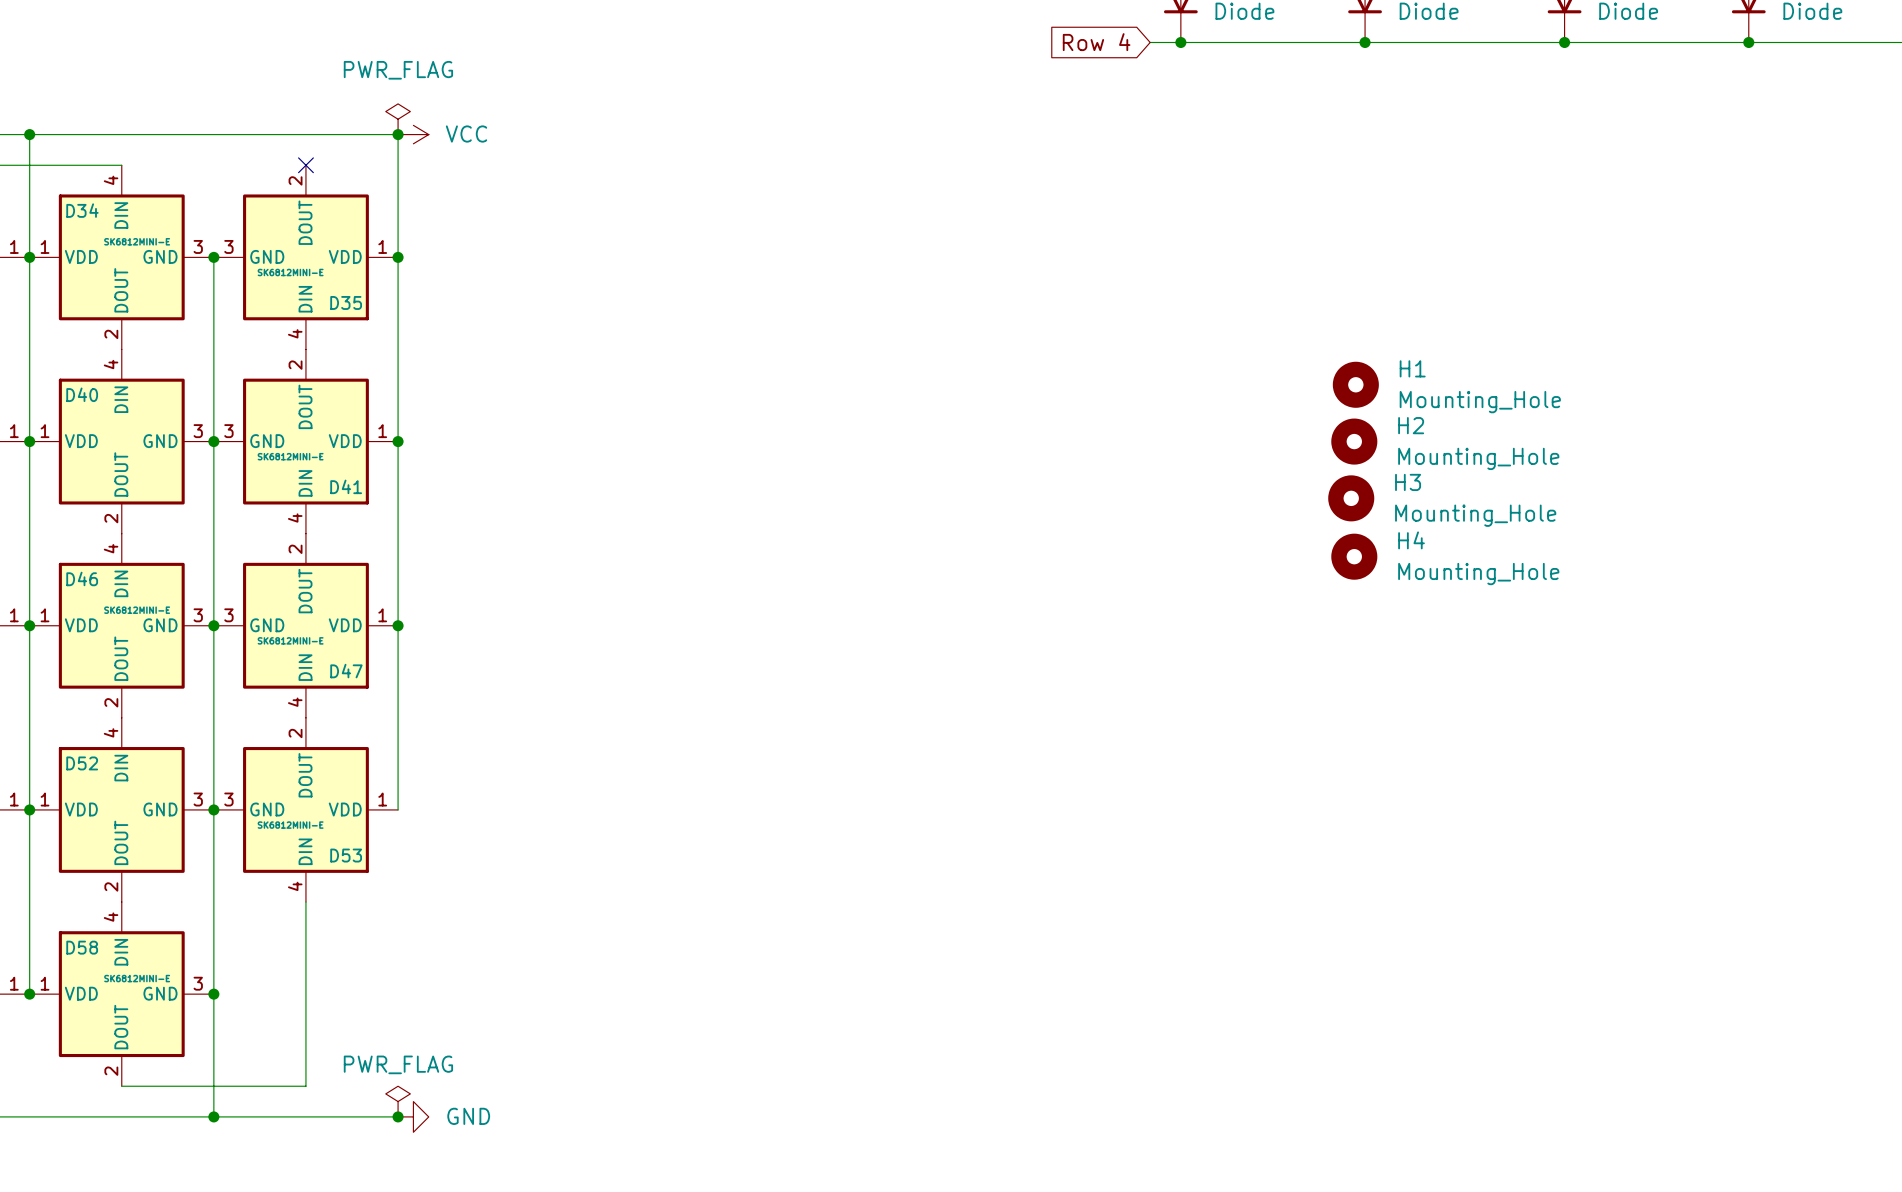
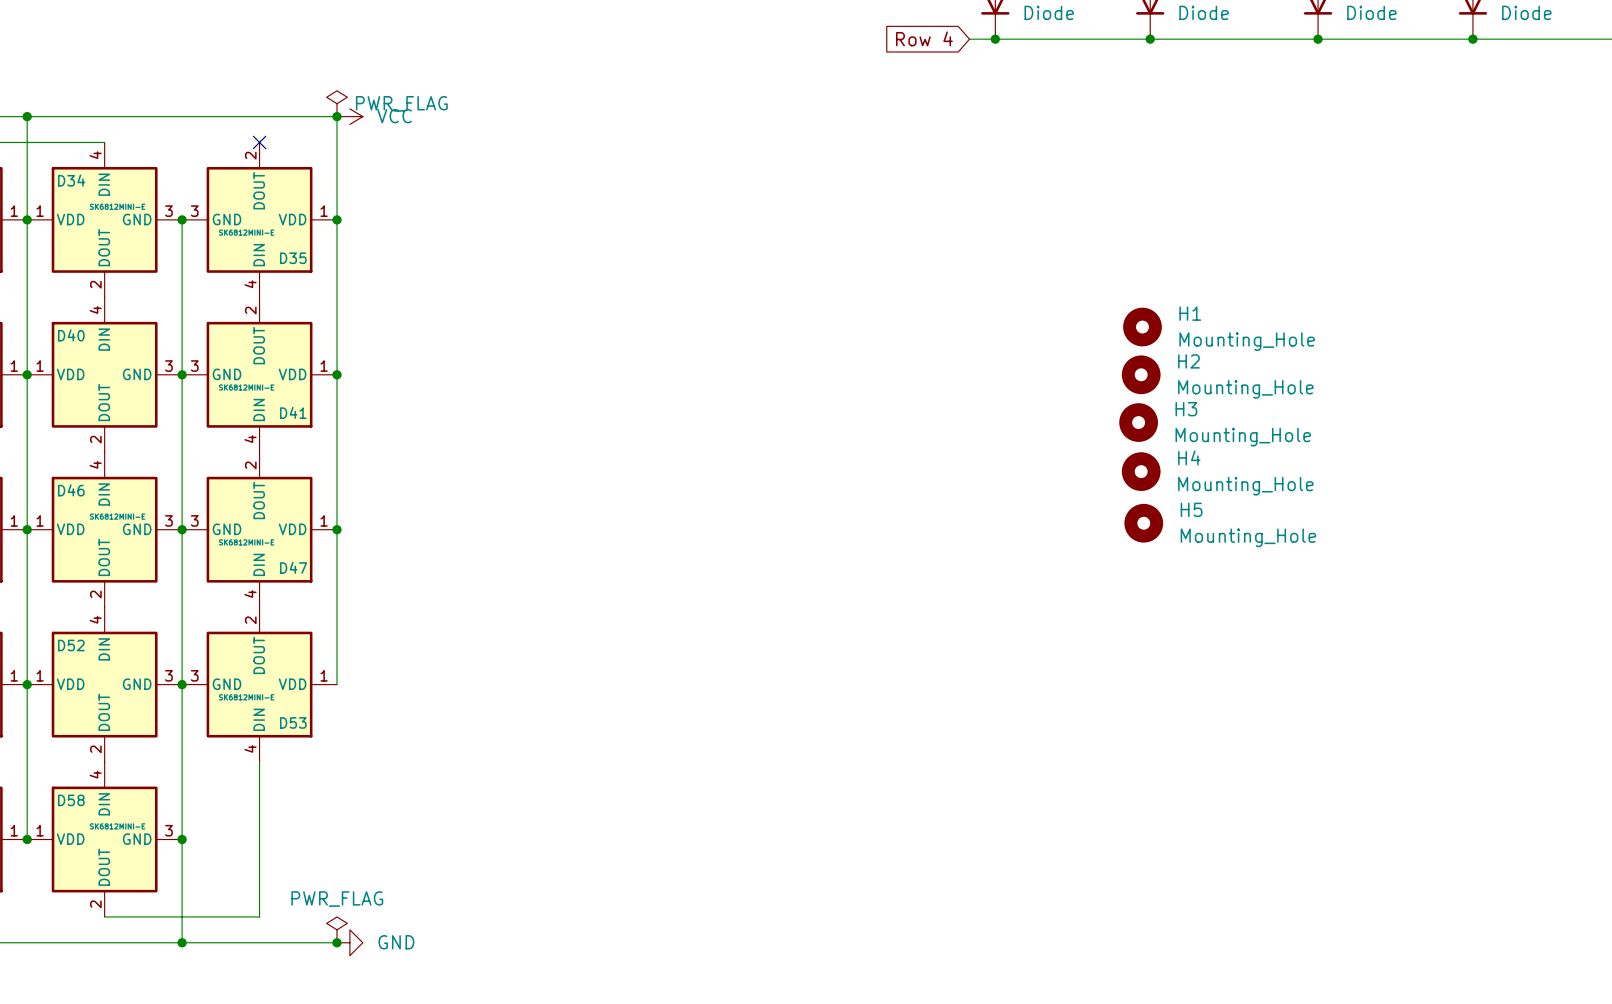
power symbol text position: PWR_FLAG (398, 70) -> PWR_FLAG (401, 103)
H5: none -> Mounting_Hole (1143, 523)

